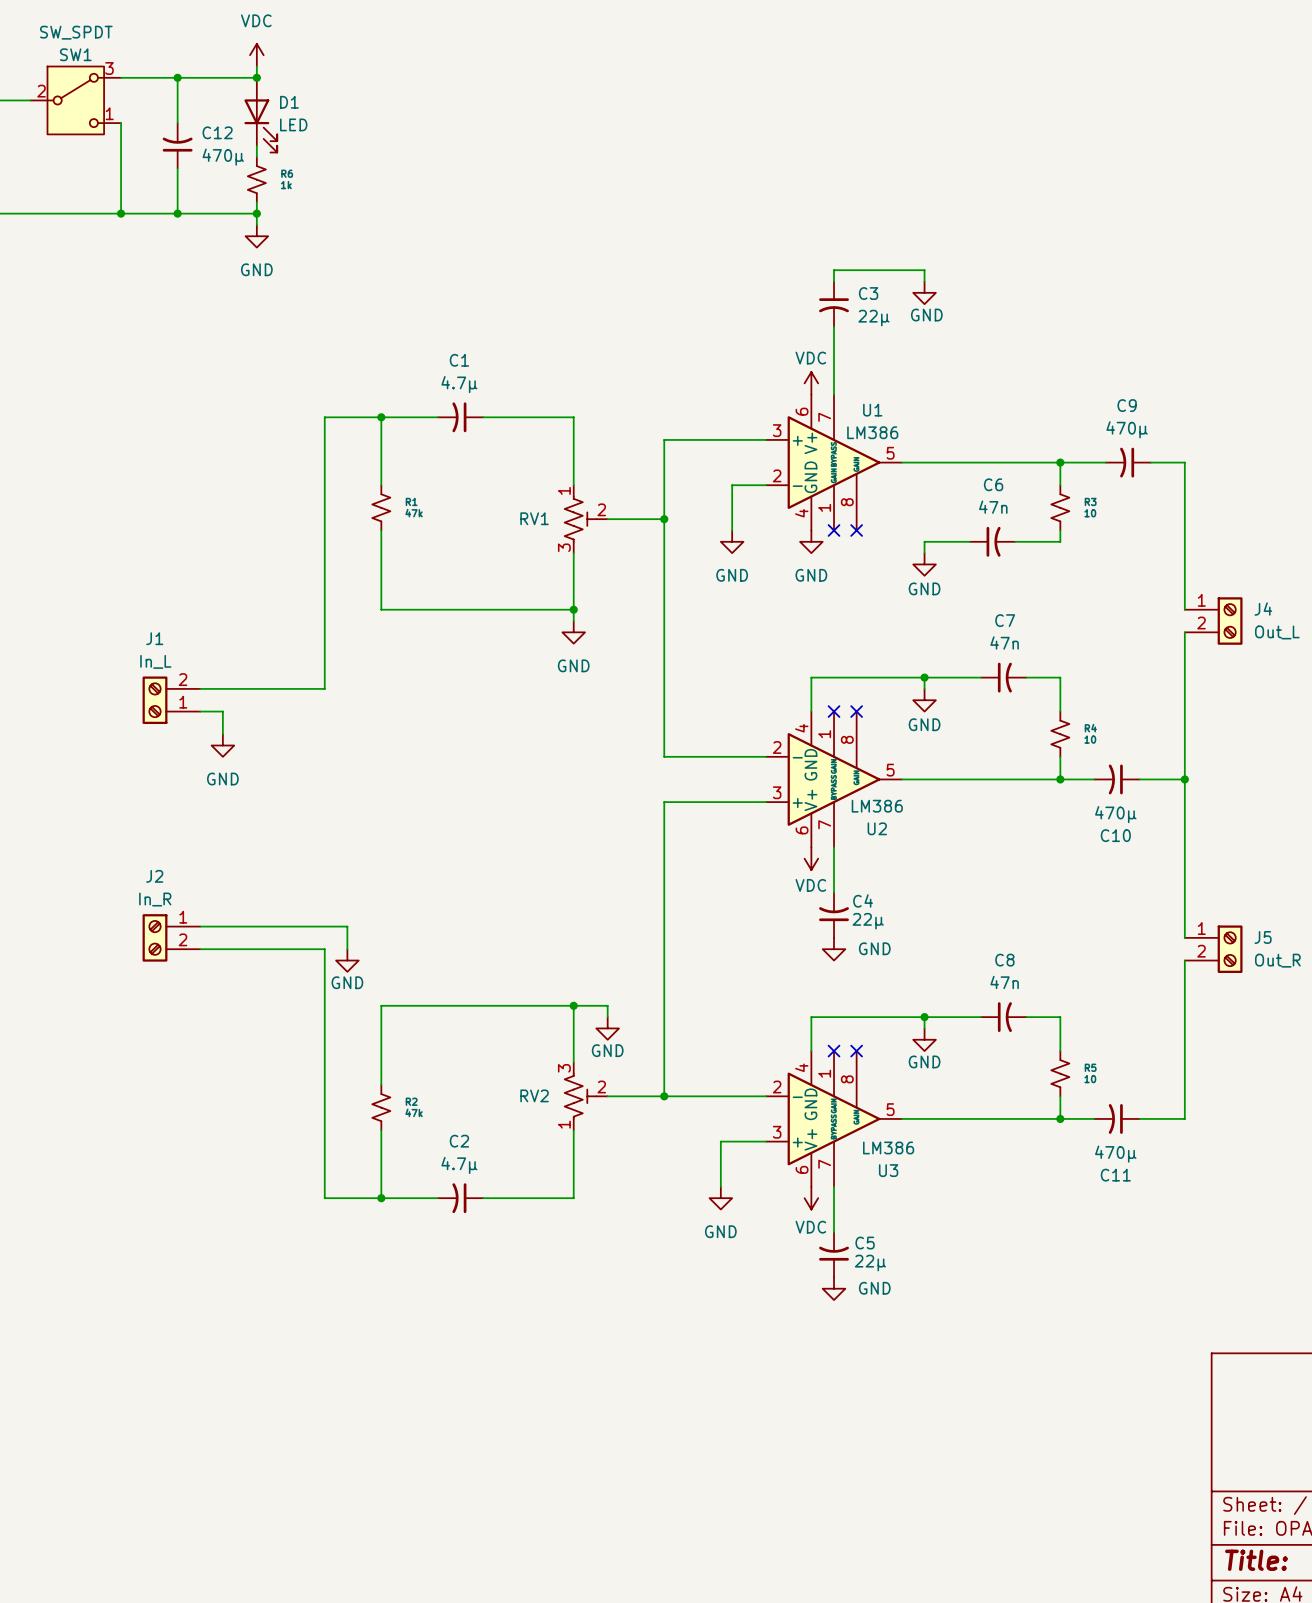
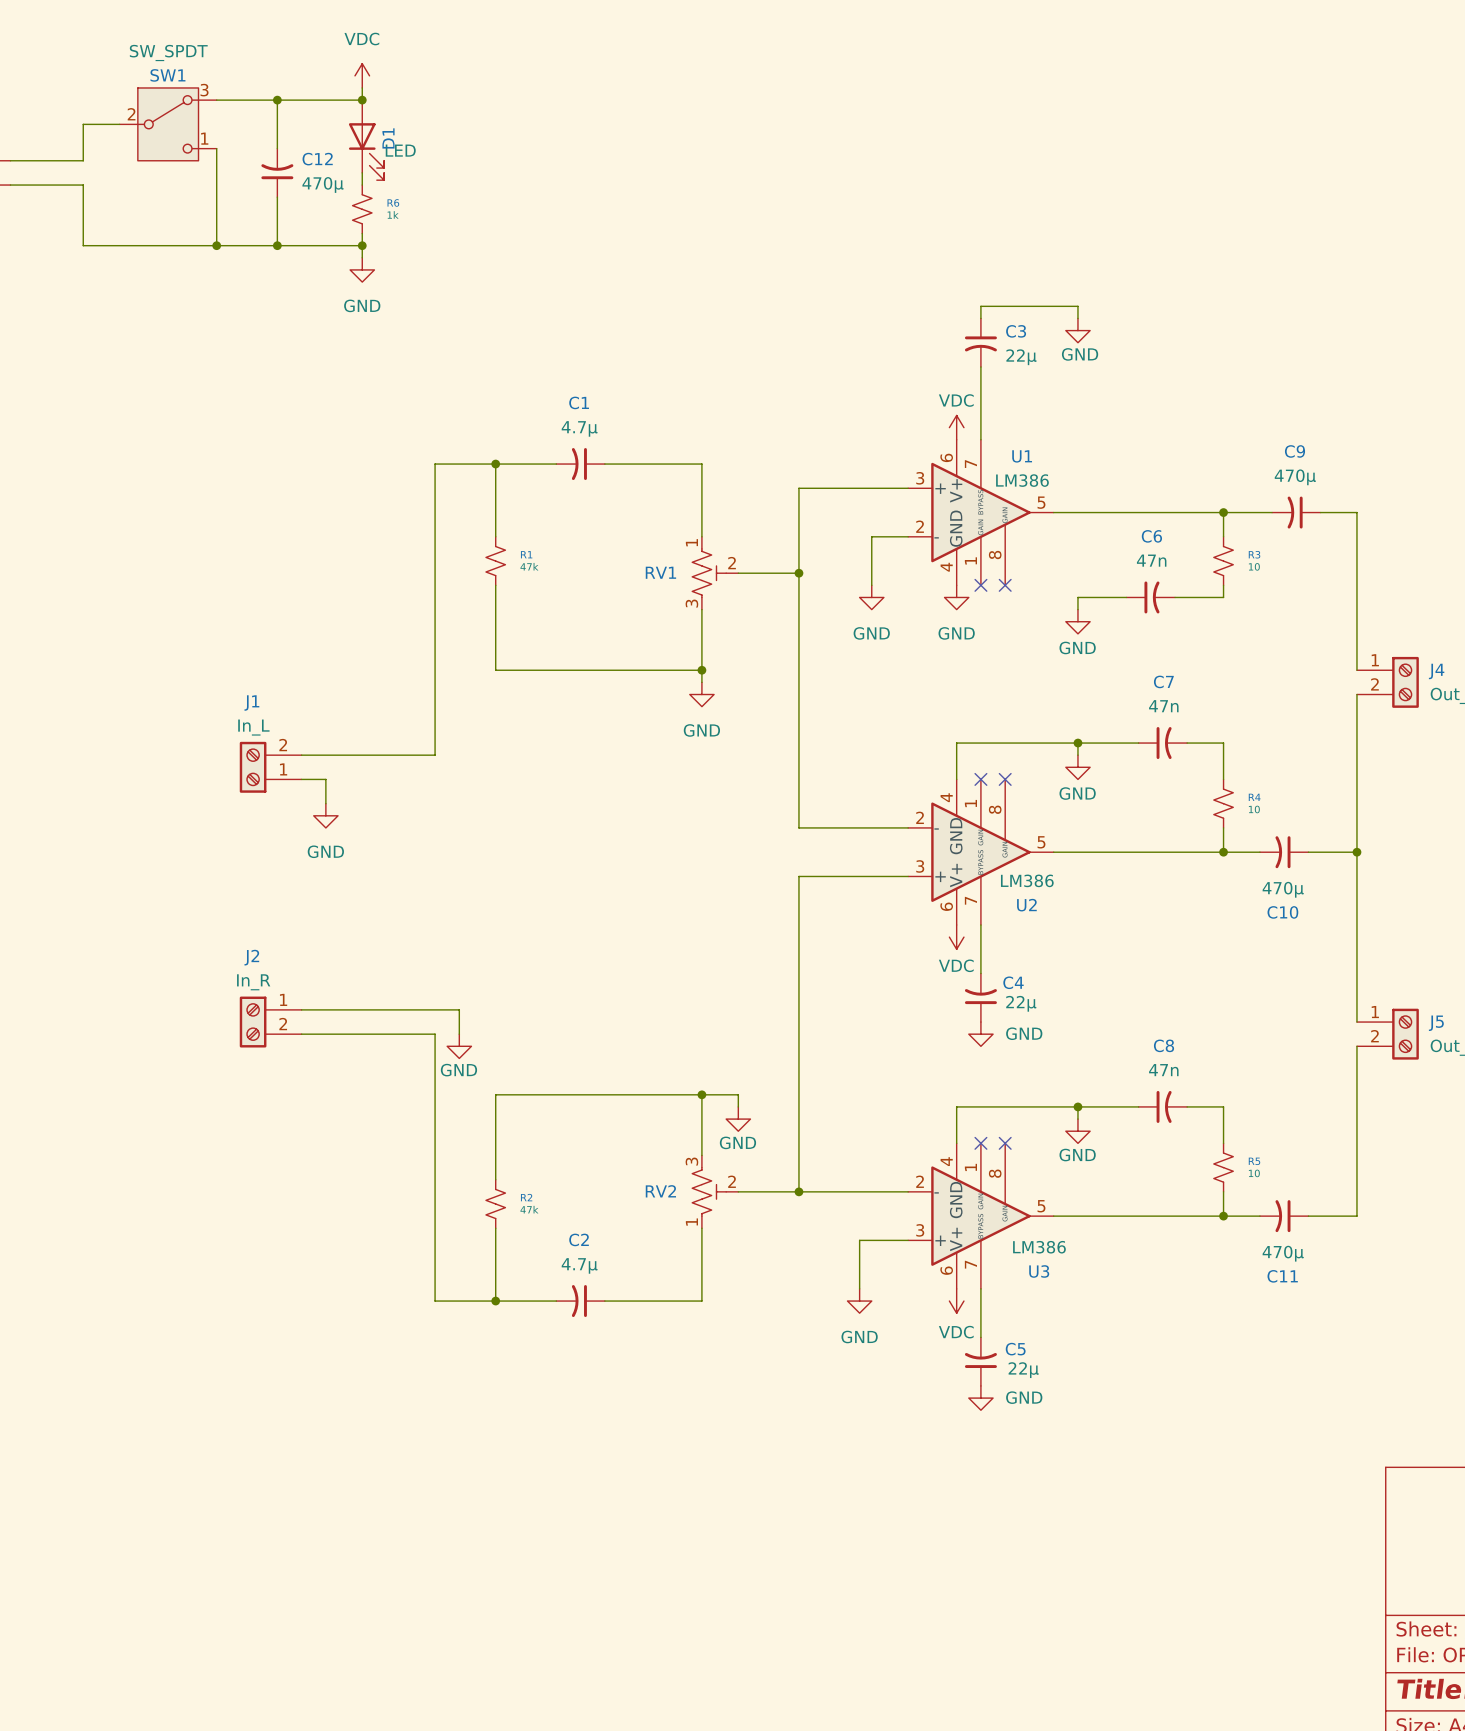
D1 name rotation: 0° (289, 102) -> 90° counterclockwise (388, 138)

